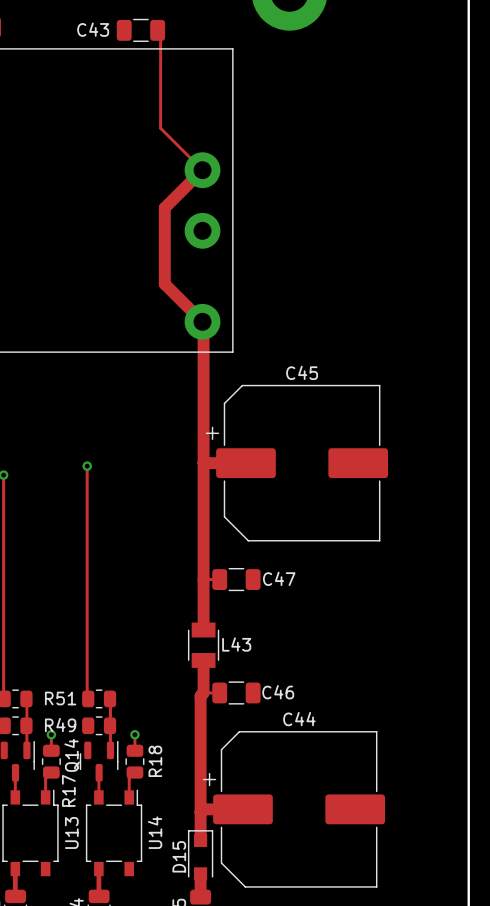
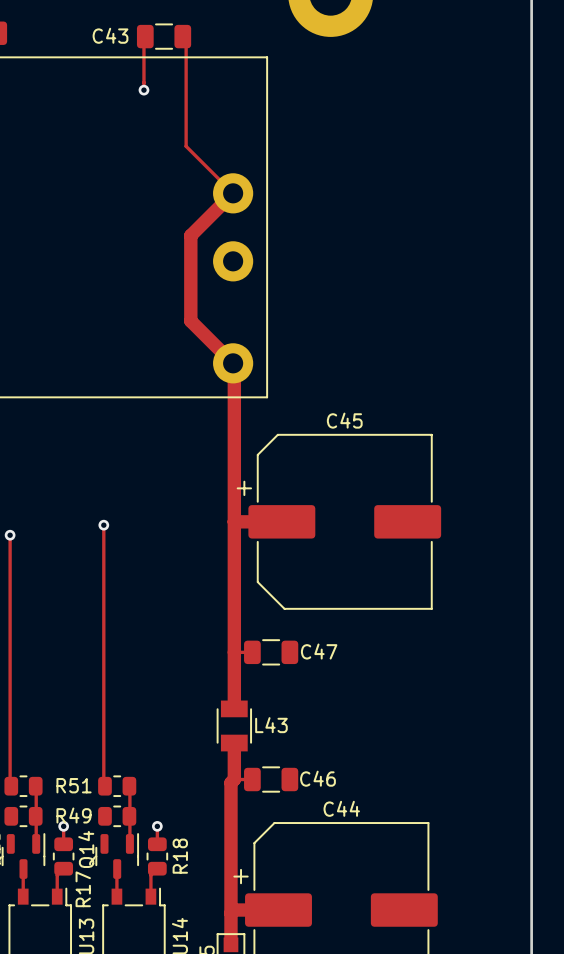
track: none -> (143, 41) (143, 90)
via: none -> (143, 90)

